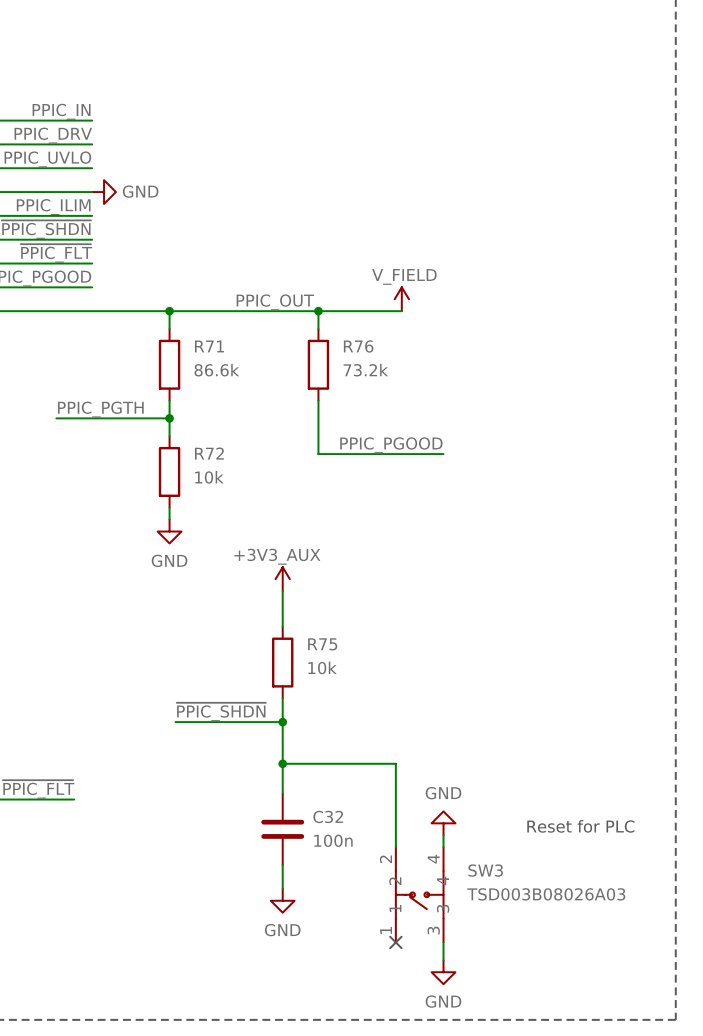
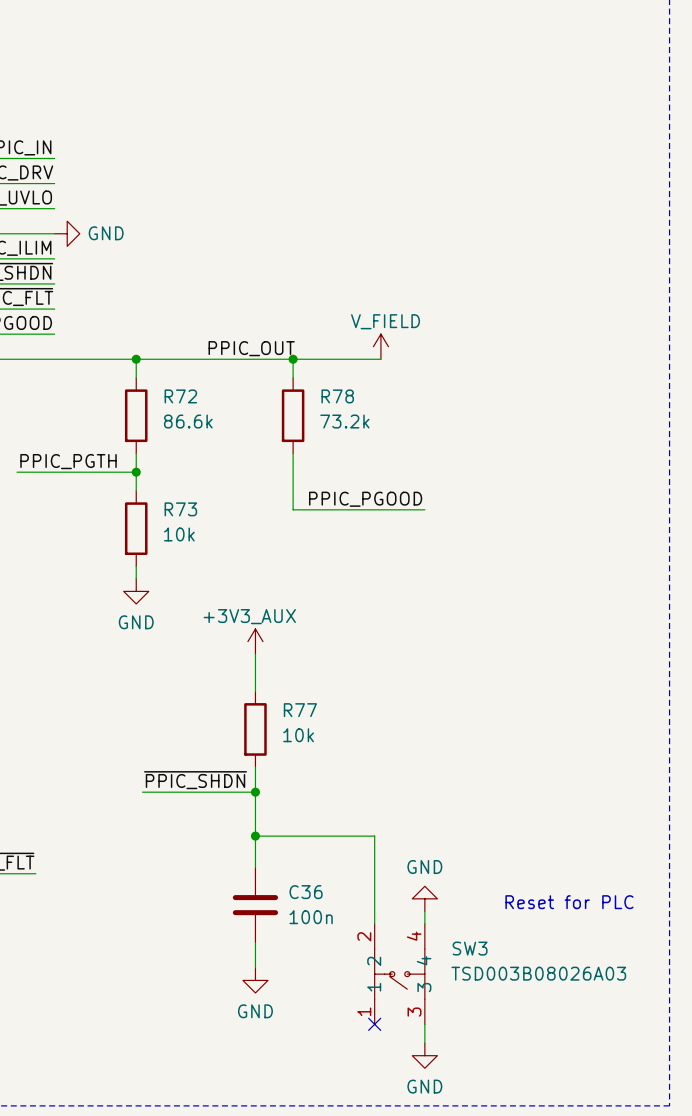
R71 name: R71 (209, 346) -> R72 (180, 396)
R76 name: R76 (358, 346) -> R78 (337, 396)
R72 name: R72 (209, 453) -> R73 (180, 509)
R75 name: R75 (322, 644) -> R77 (300, 710)
C32 name: C32 (328, 816) -> C36 (306, 892)

